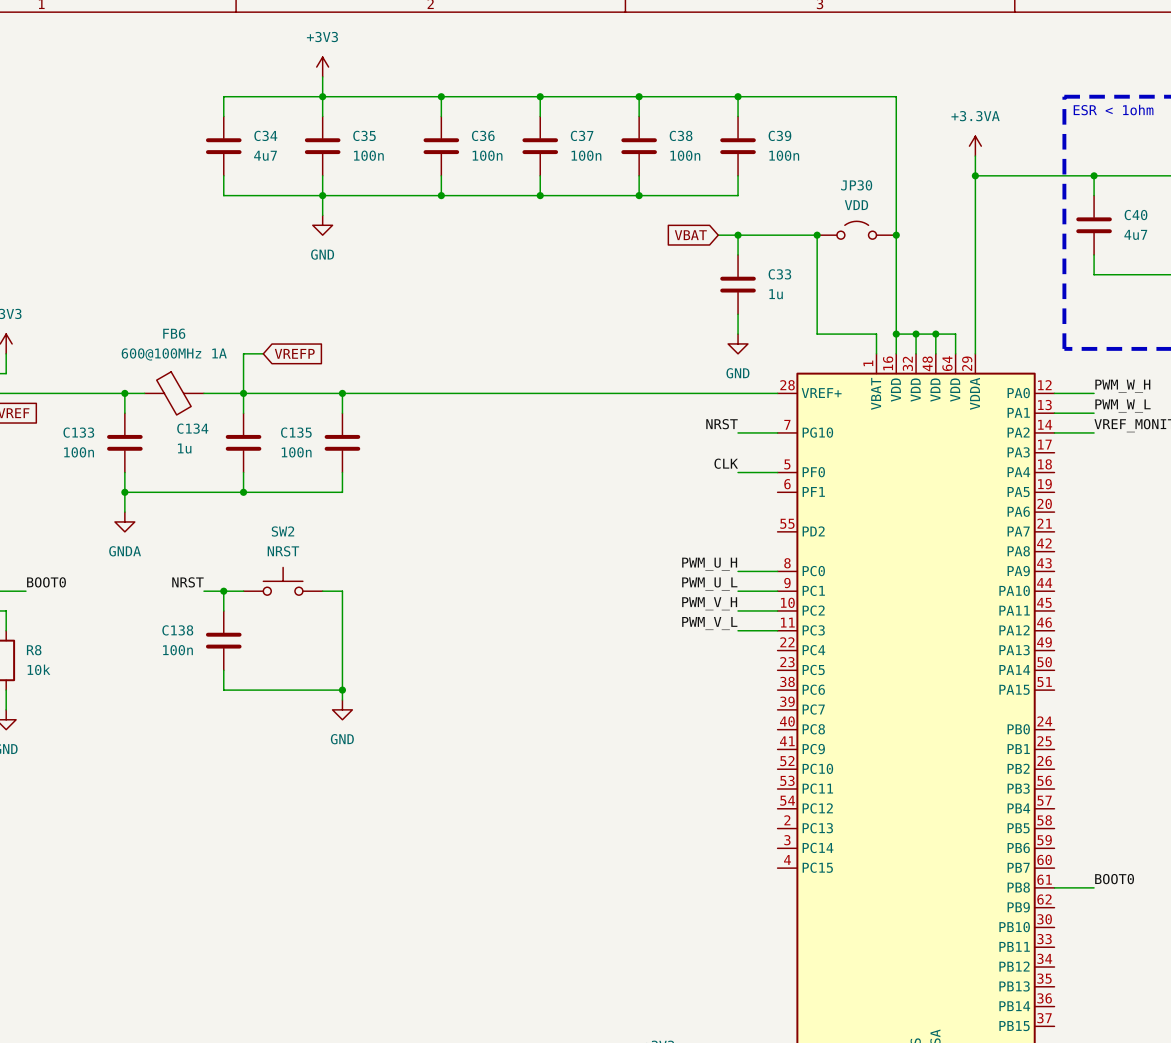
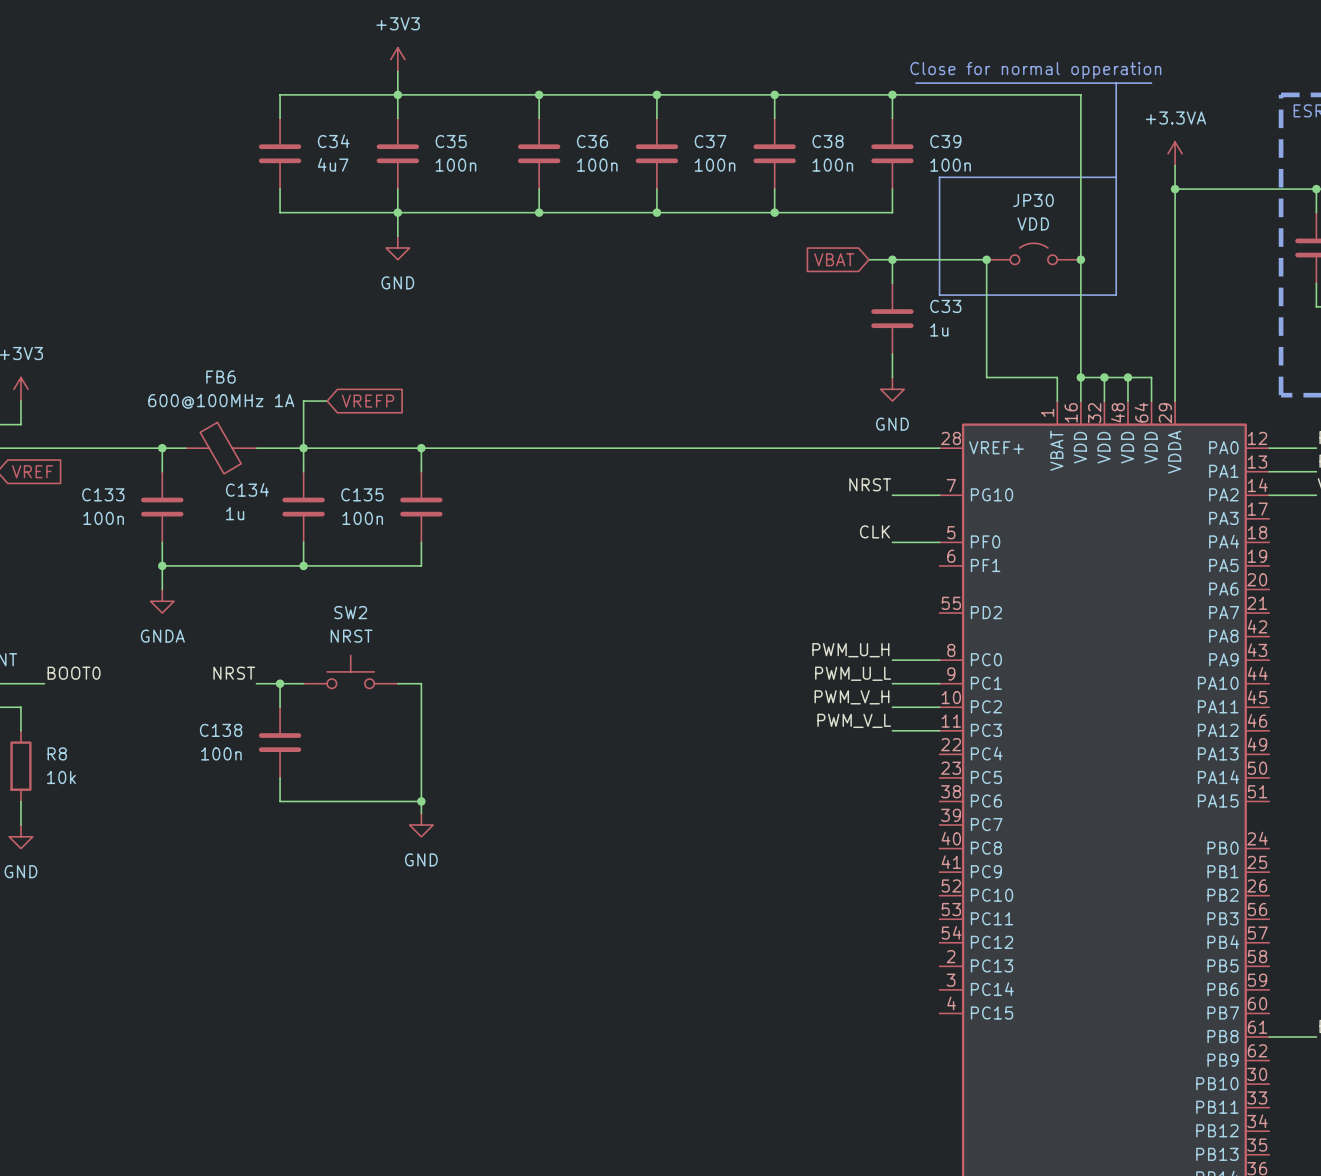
text: none -> Close for normal opperation (1035, 70)
line: none -> (915, 83) (1151, 83)
line: none -> (1116, 83) (1116, 295) (939, 295) (939, 177) (1116, 177)

